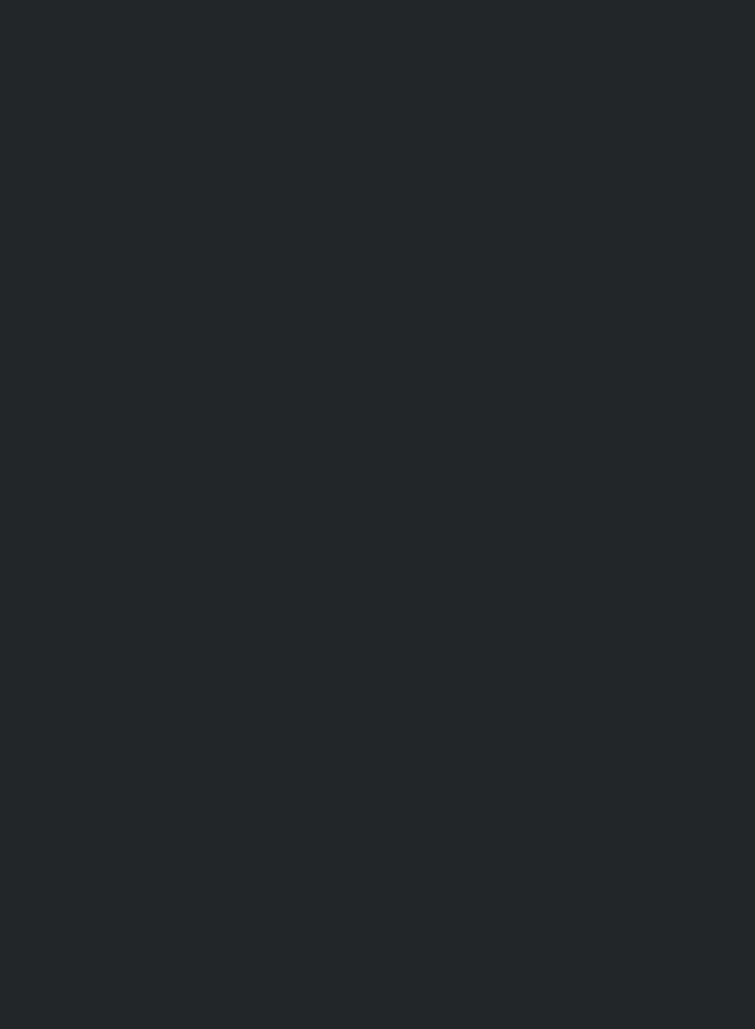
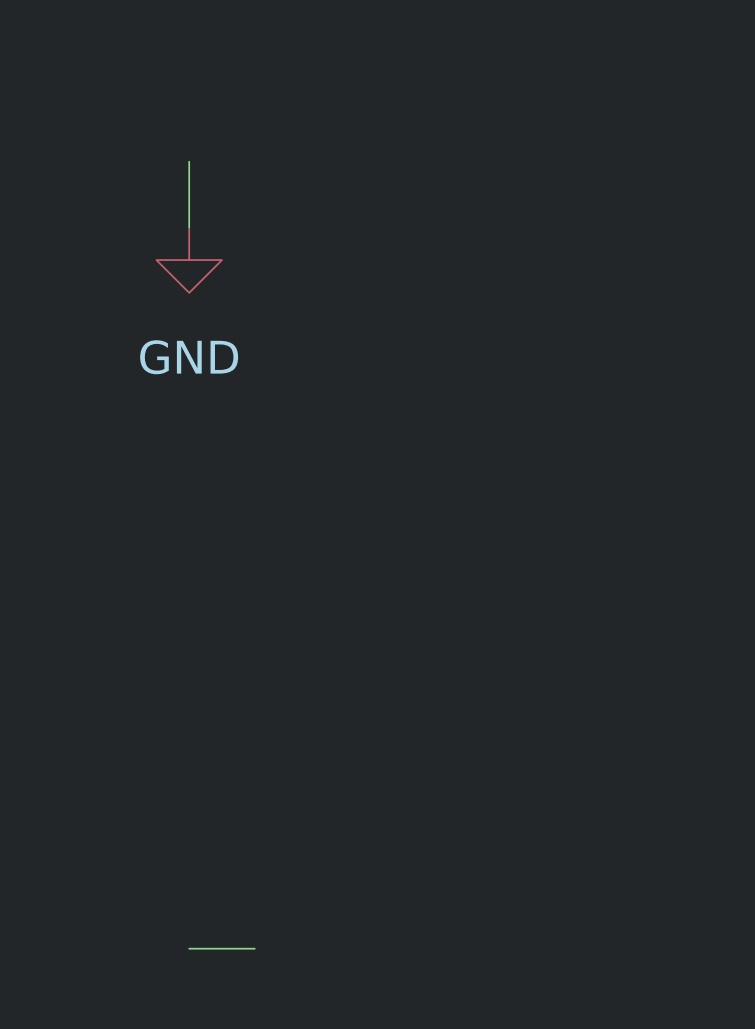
wire: none -> (189, 161) (189, 227)
power symbol: none -> GND (189, 260)
wire: none -> (189, 948) (254, 948)

